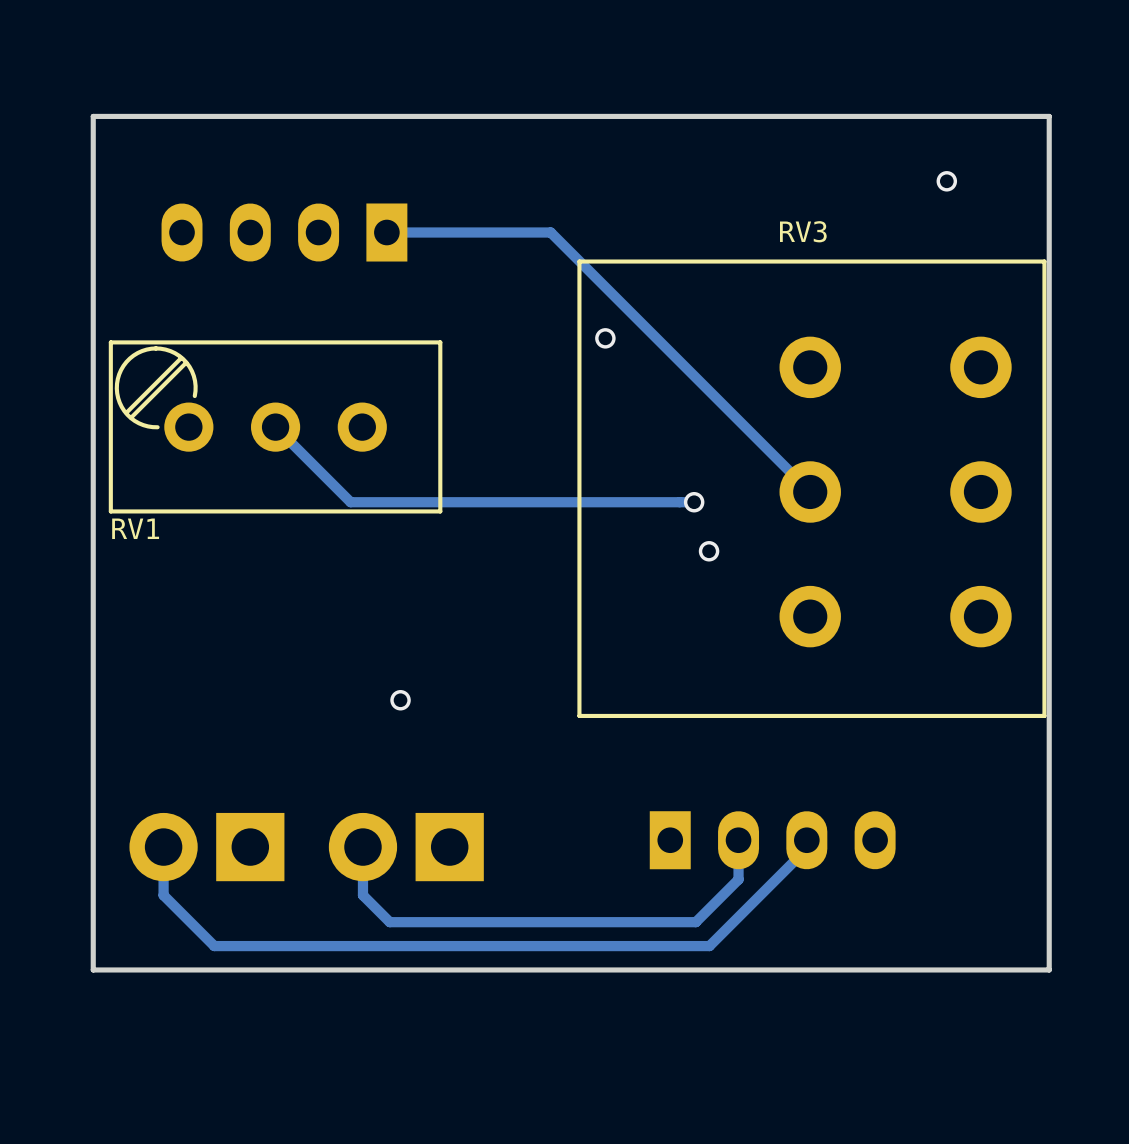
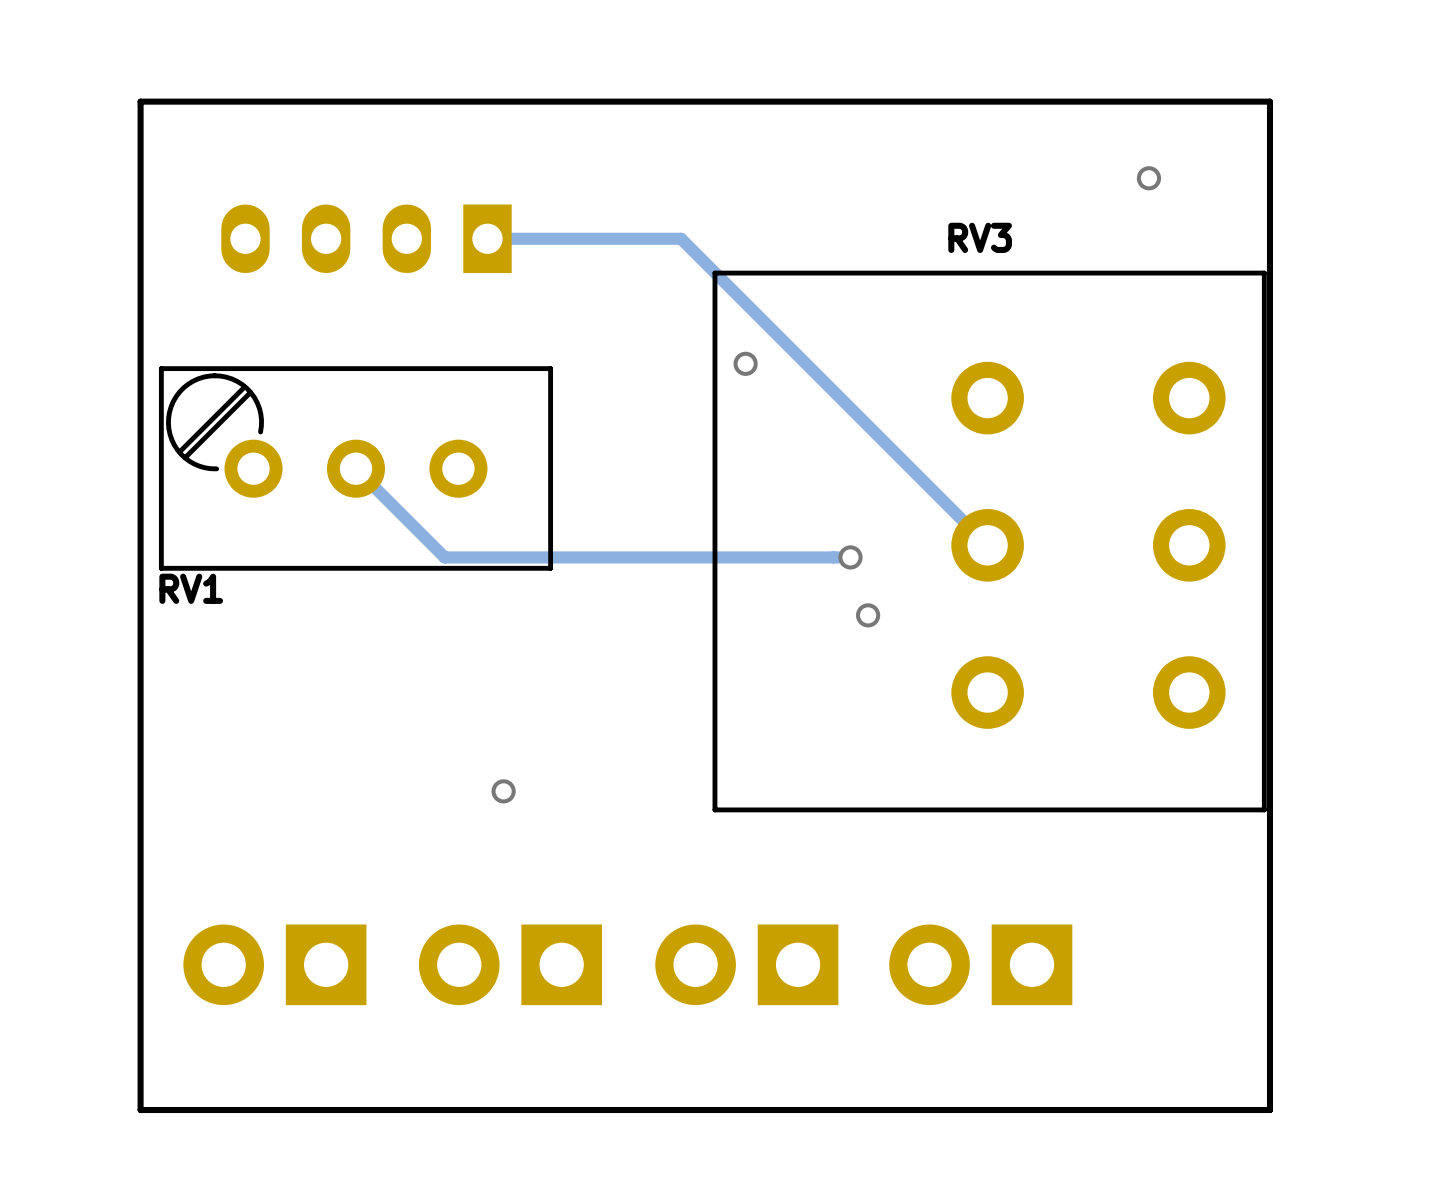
part footprint: [649, 811, 896, 870] -> [889, 924, 1073, 1006]
track: (738, 840) (738, 879) (695, 922) (389, 922) (362, 895) (362, 847) -> none
track: (806, 840) (806, 848) (709, 946) (214, 946) (163, 895) (163, 847) -> none
part: none -> (746, 964)

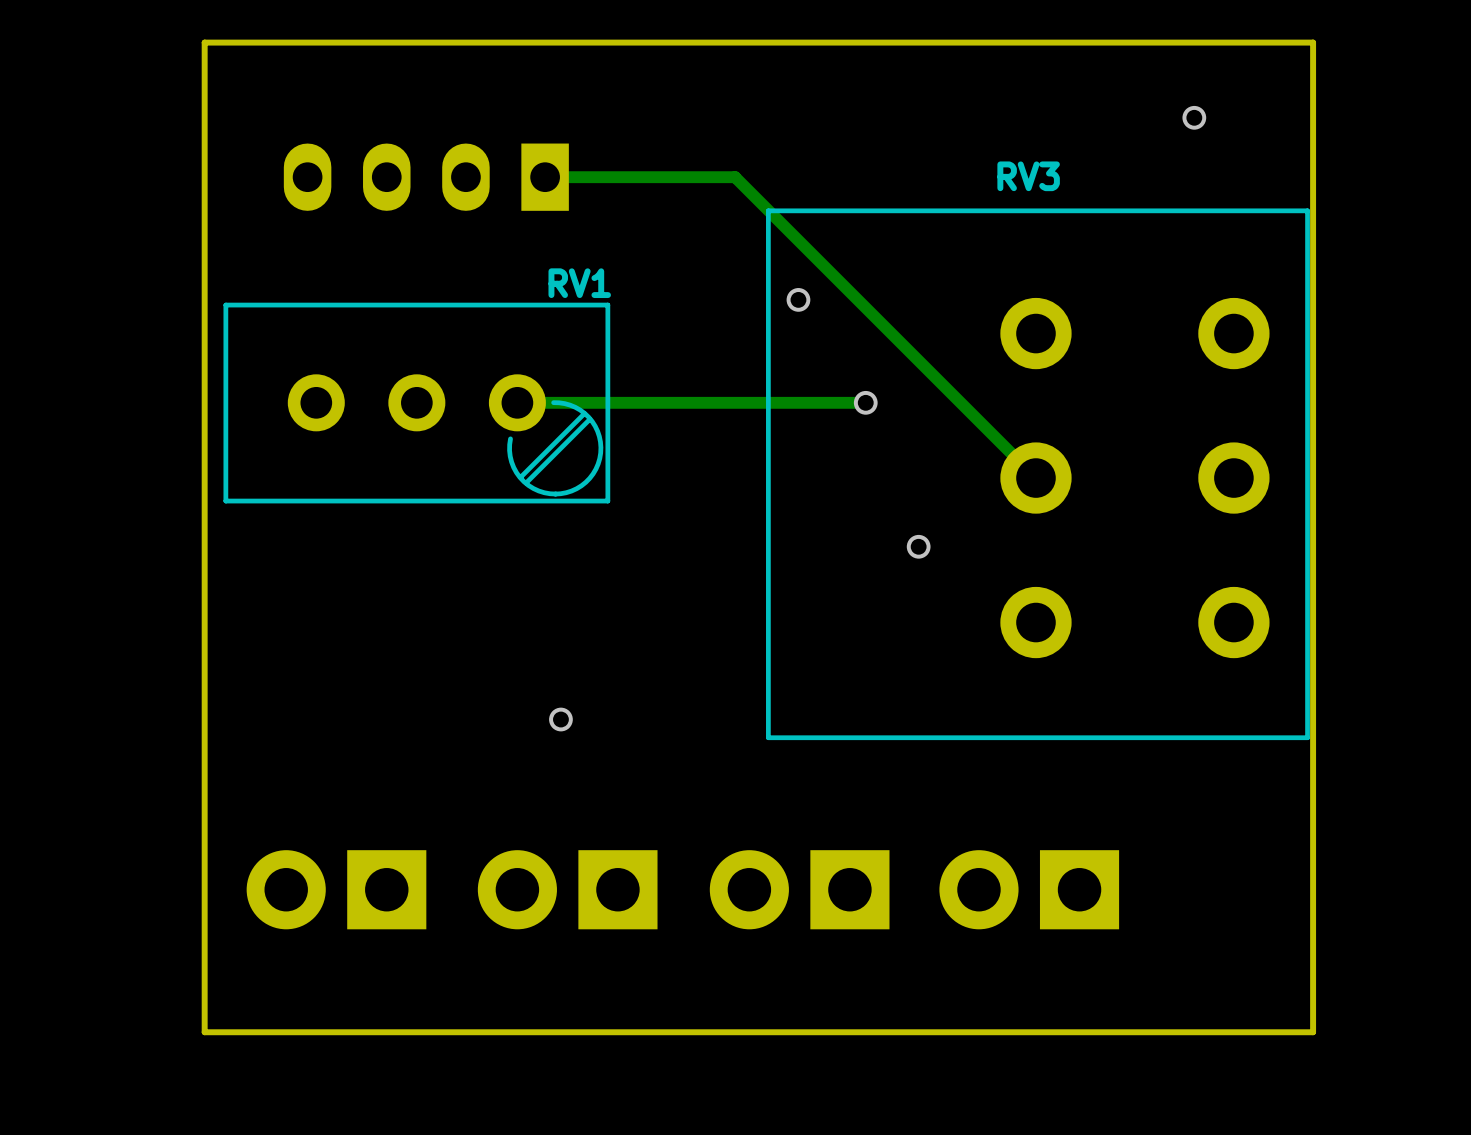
track: (355, 468) (444, 557) (850, 557) -> none
RV1 rotation: 0° (355, 468) -> 180° (416, 403)
track: none -> (865, 402) (517, 402)
via position: (850, 557) -> (865, 402)

